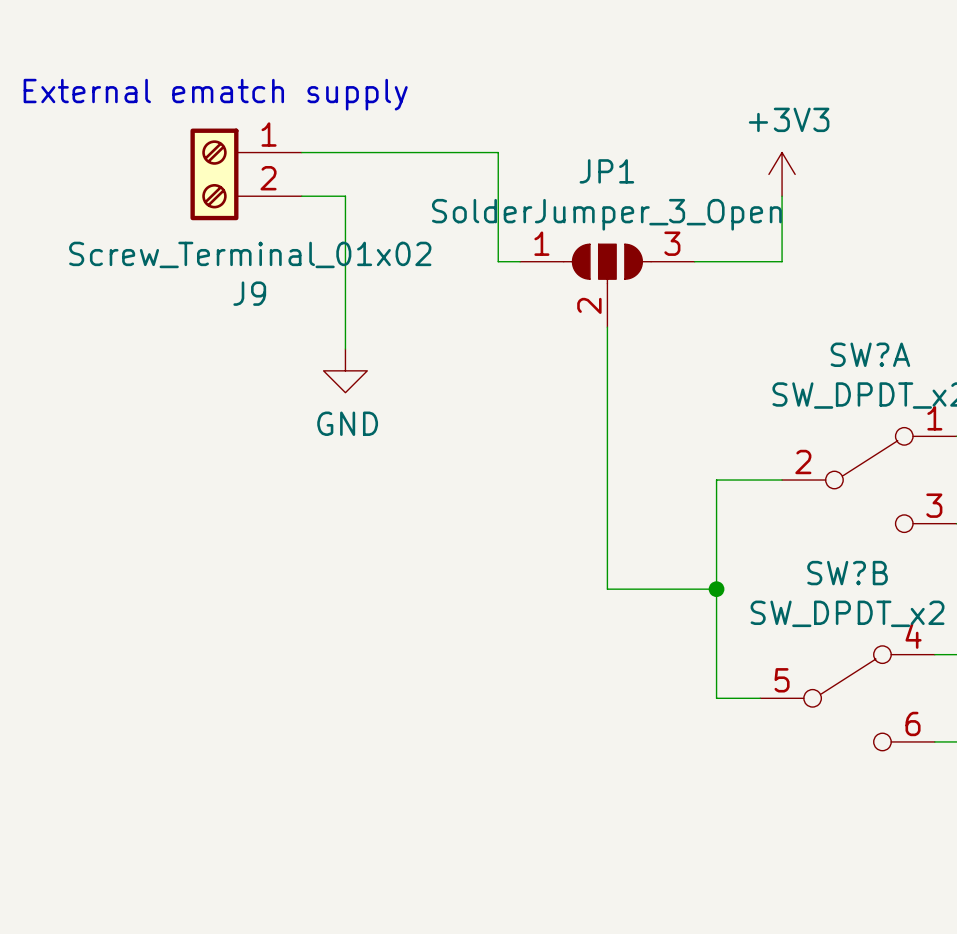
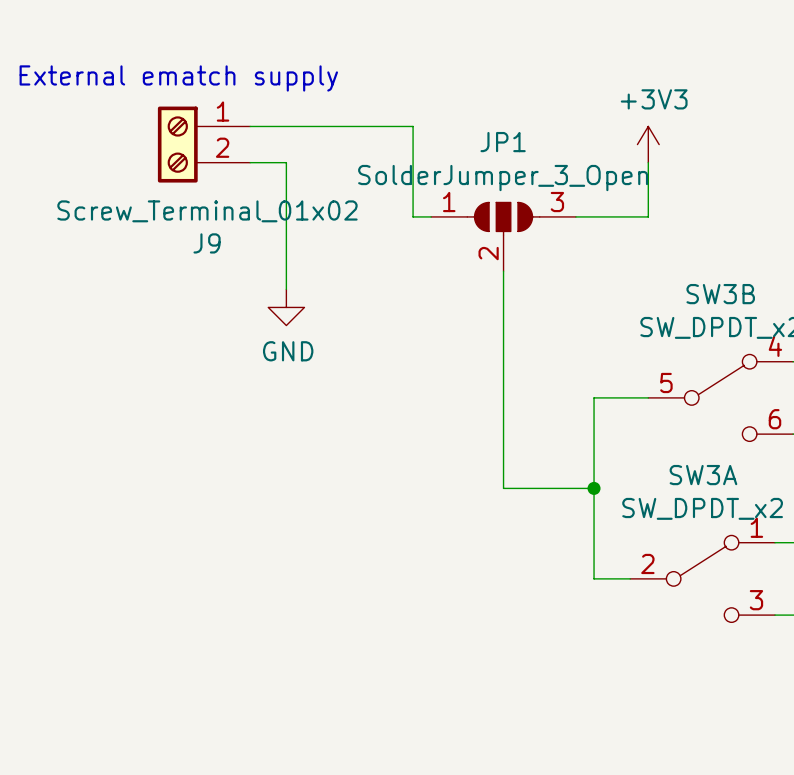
SW?A name: SW?A (870, 354) -> SW3B (720, 294)
SW?A pin number: 1 (934, 418) -> 4 (775, 346)
SW?A pin number: 2 (803, 462) -> 5 (666, 383)
SW?A pin number: 3 (934, 505) -> 6 (774, 419)
SW?B name: SW?B (847, 573) -> SW3A (703, 475)
SW?B pin number: 4 (913, 636) -> 1 (756, 527)
SW?B pin number: 5 (782, 680) -> 2 (647, 563)
SW?B pin number: 6 (913, 723) -> 3 (756, 600)

